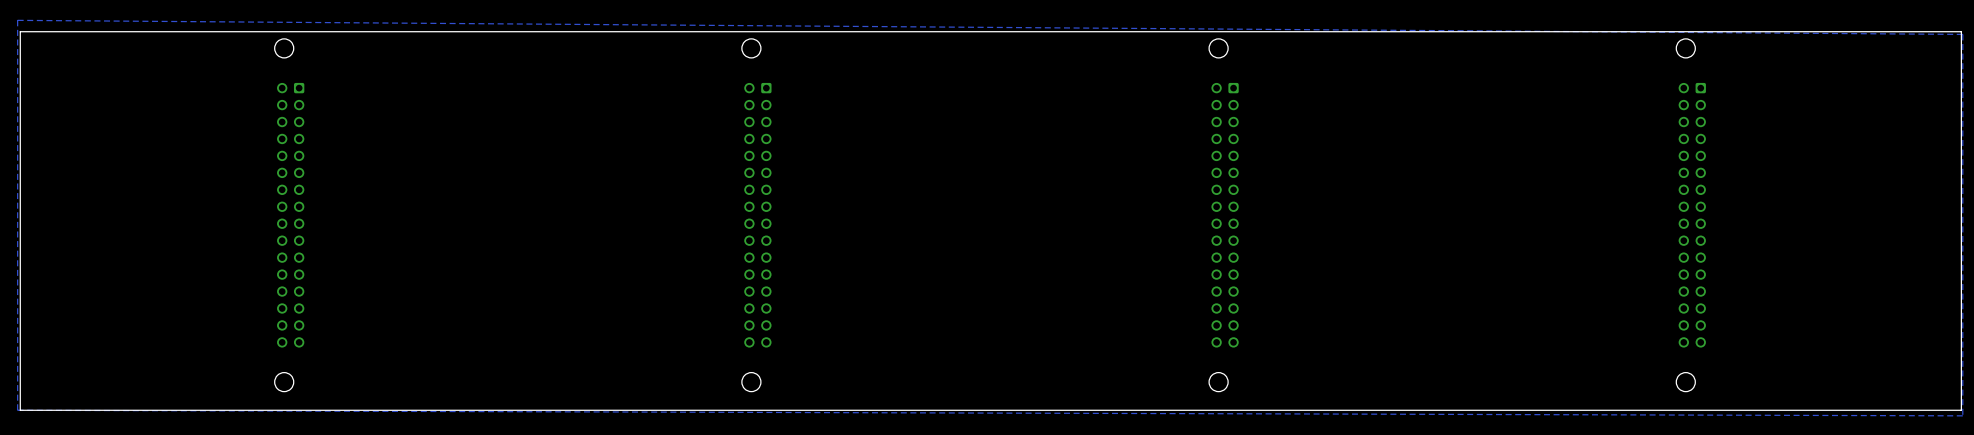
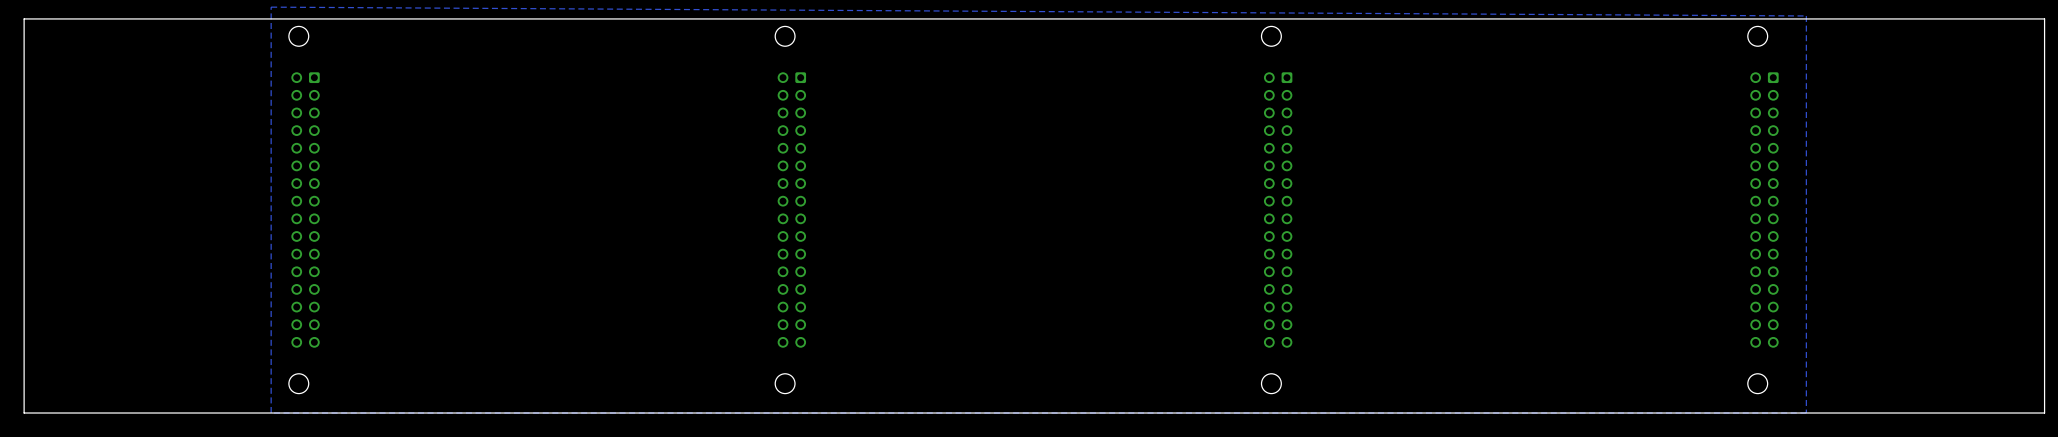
zone outline: (17, 20) (17, 410) (1962, 415) (1962, 34) (17, 20) -> (271, 7) (1806, 15) (1806, 413) (271, 413) (271, 7)

